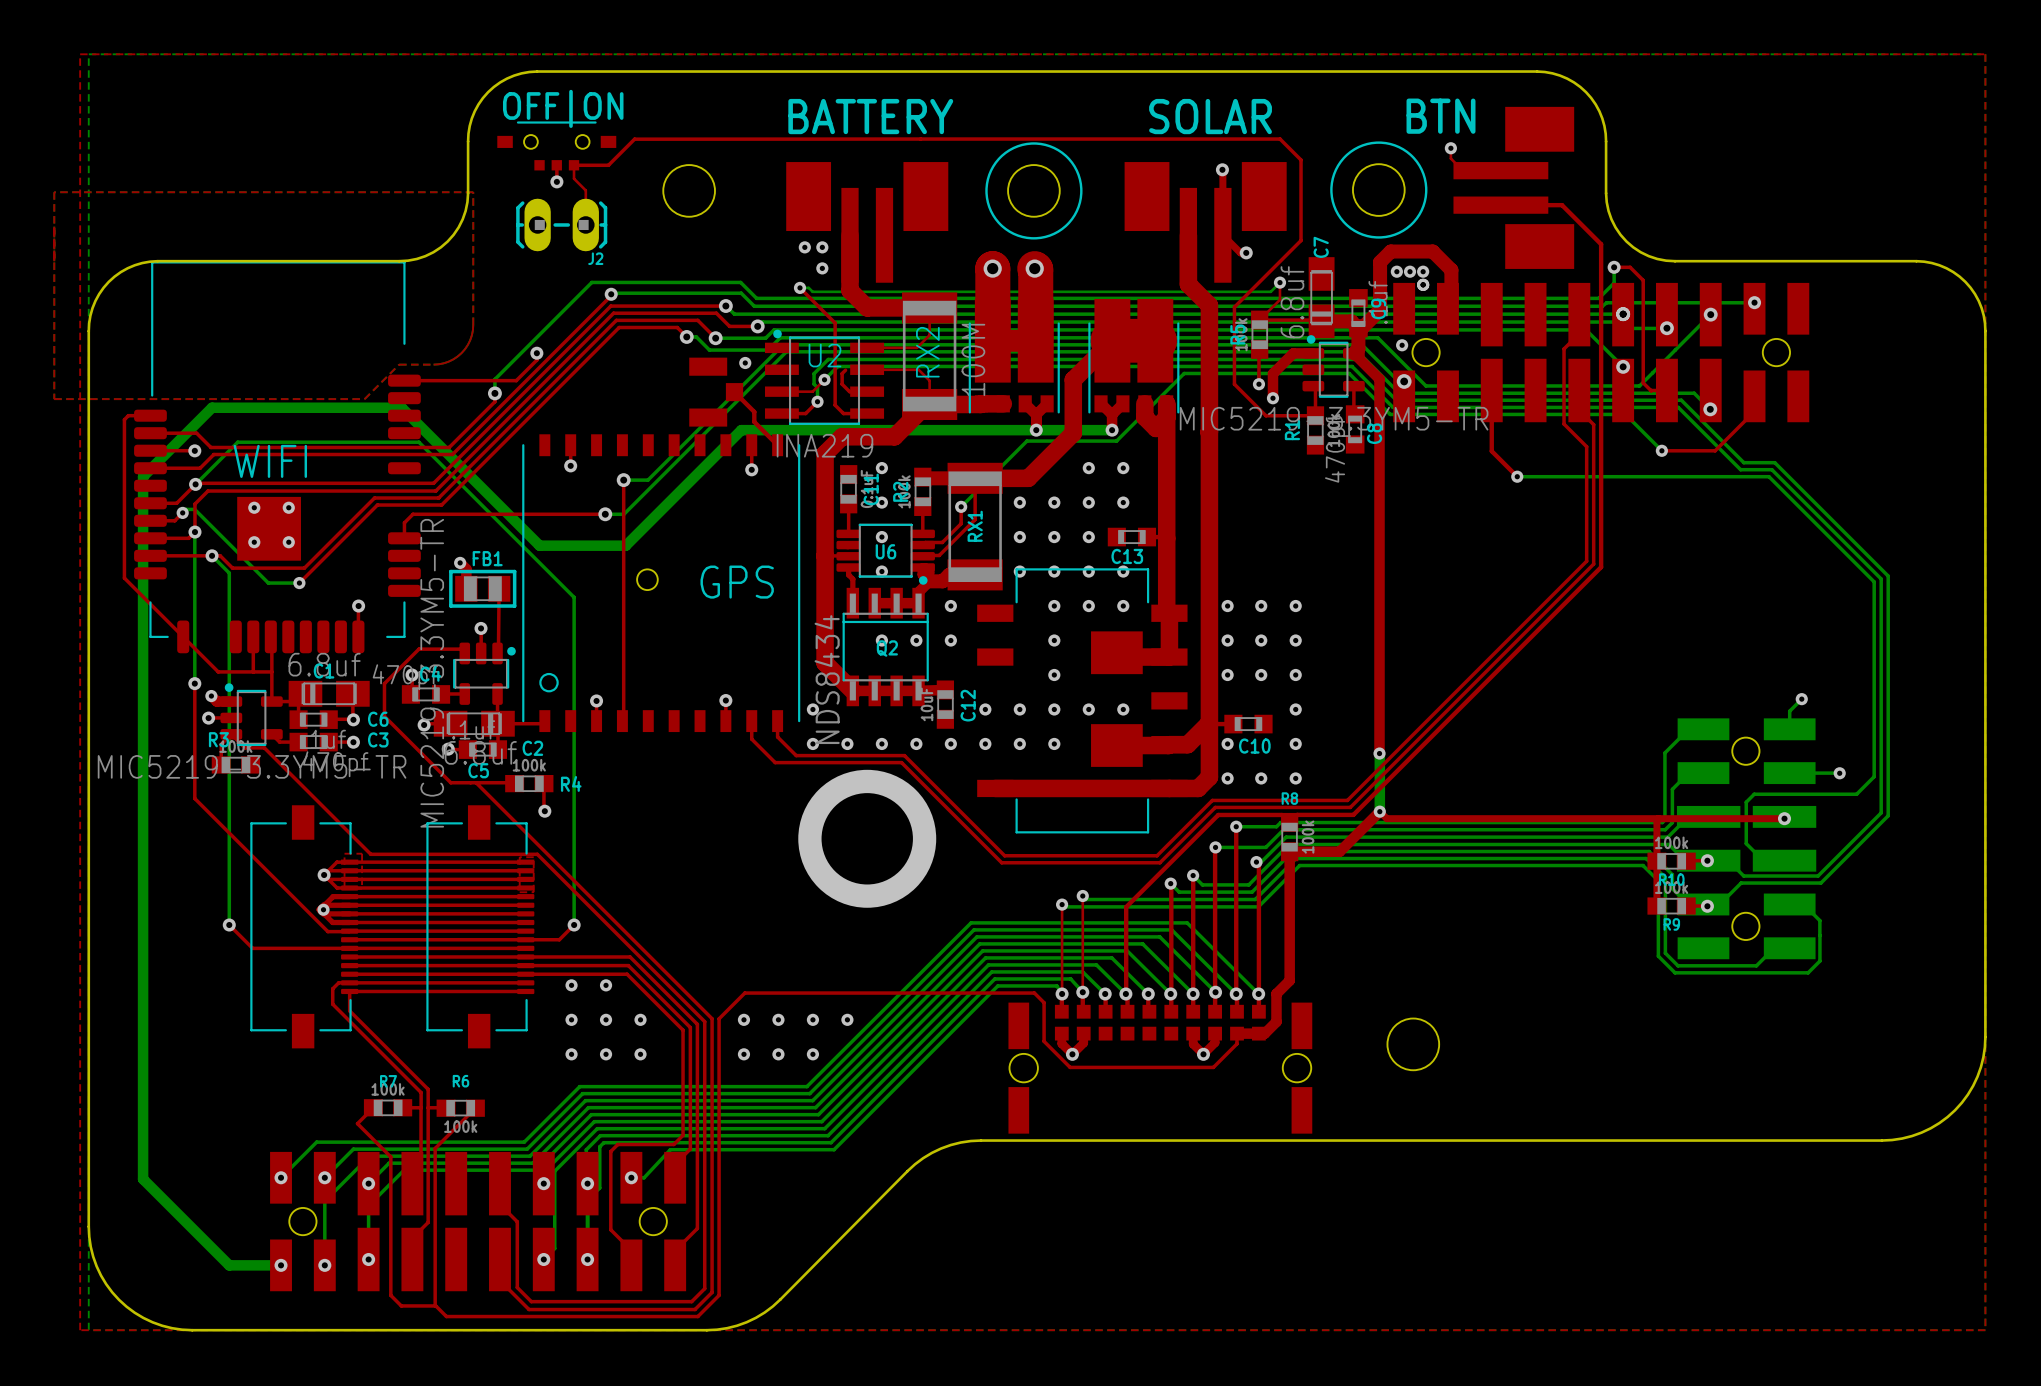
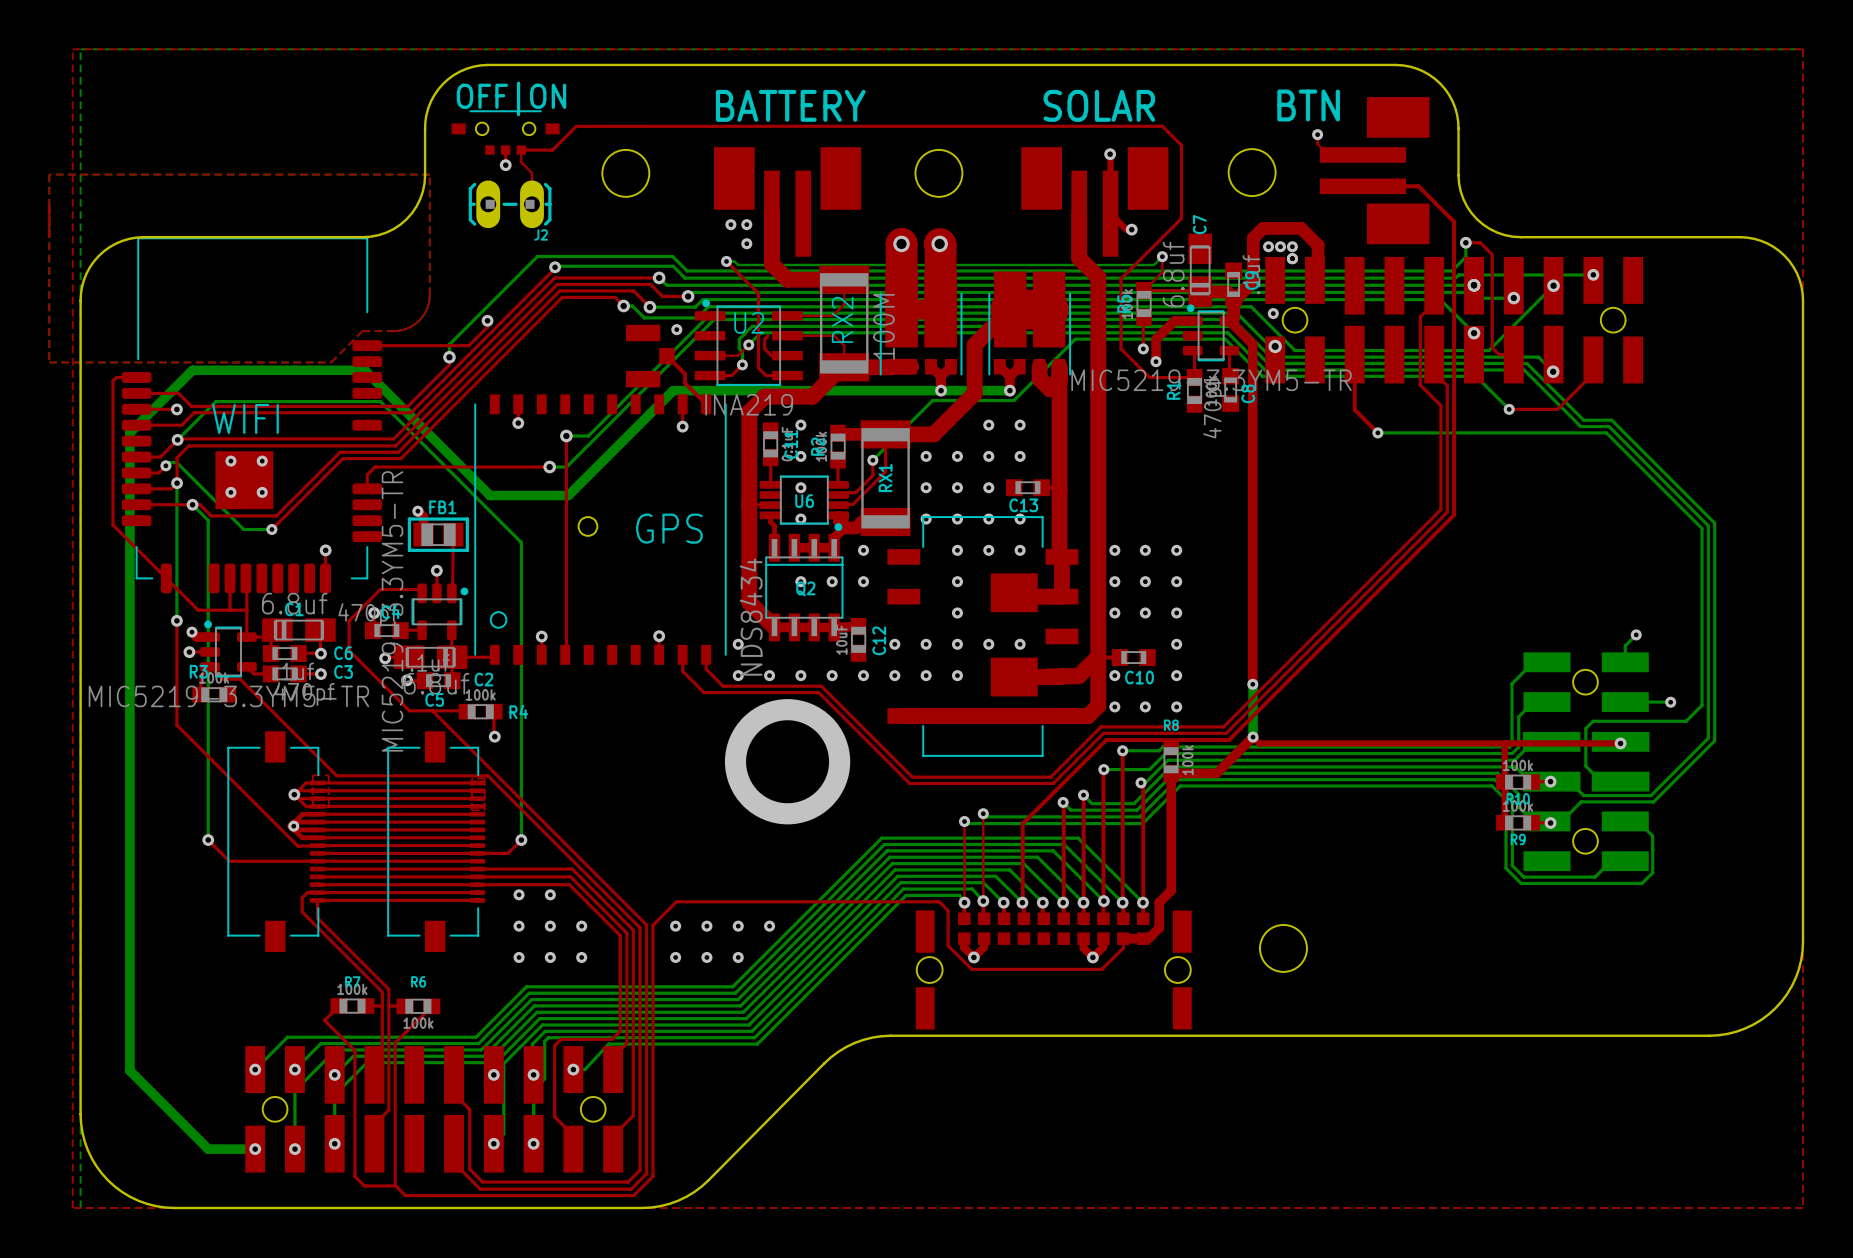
drawing: [1330, 141, 1428, 239] -> none
drawing: [985, 142, 1083, 240] -> none

